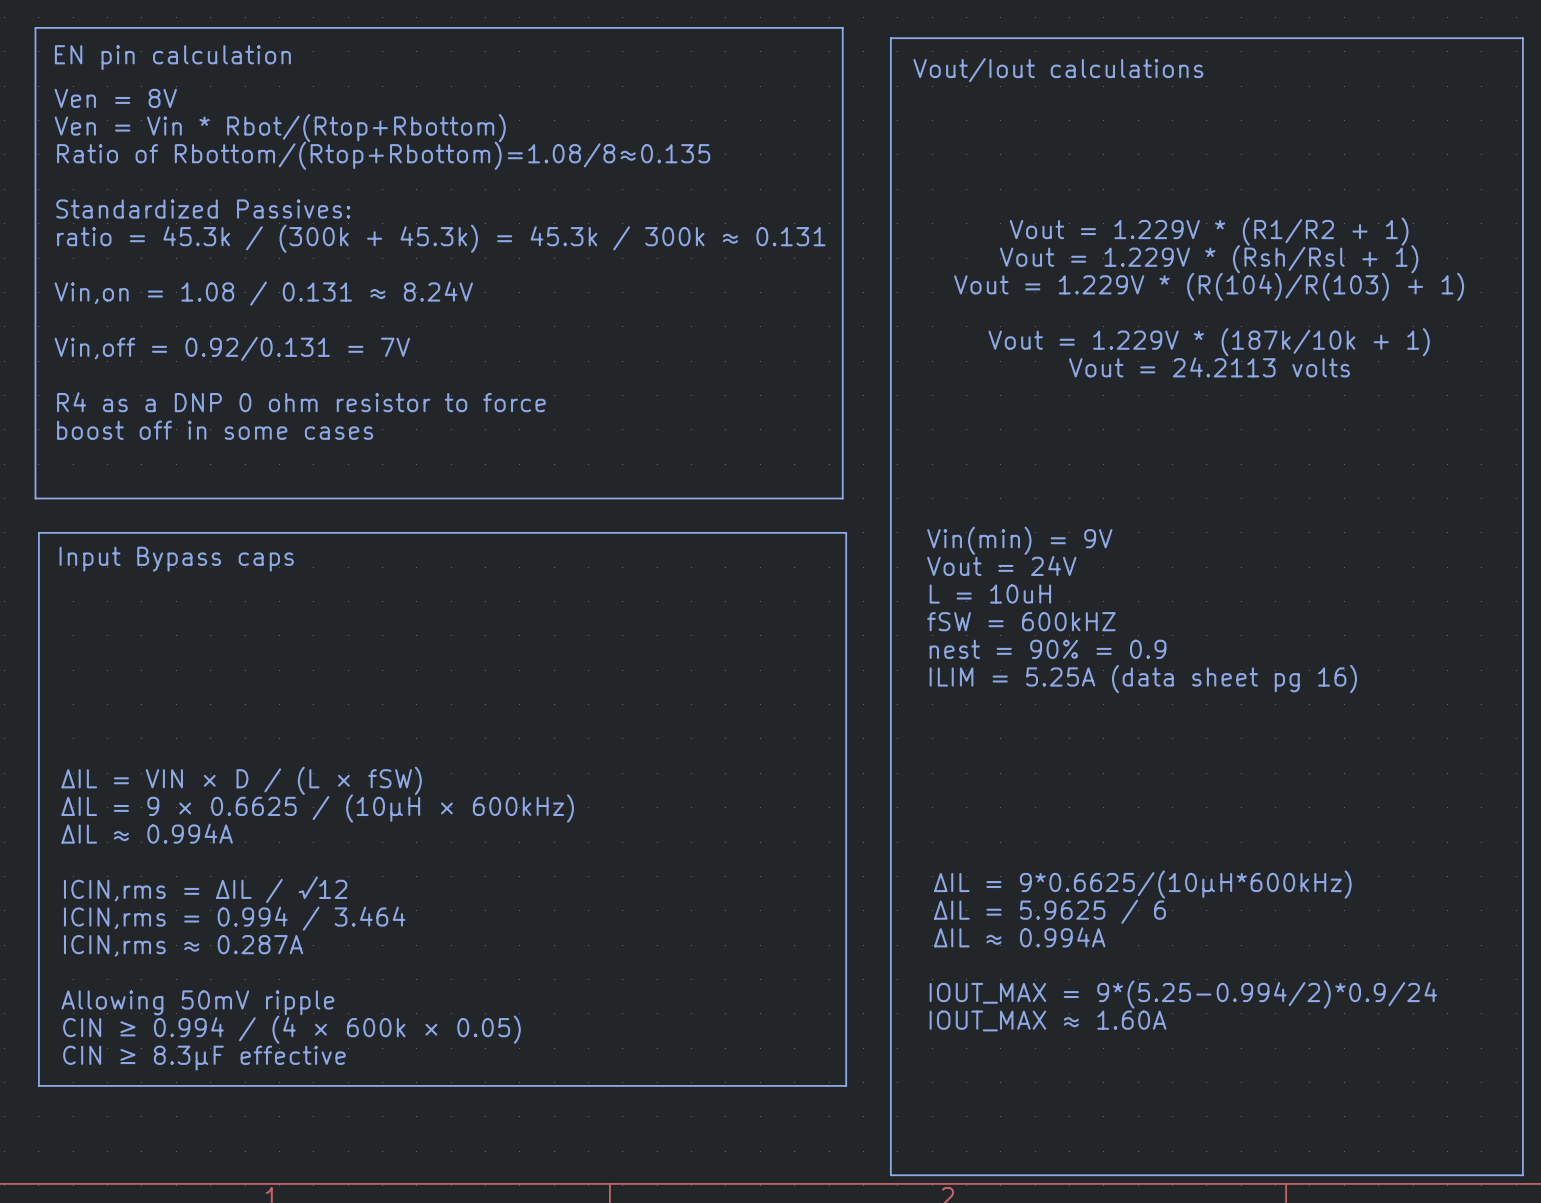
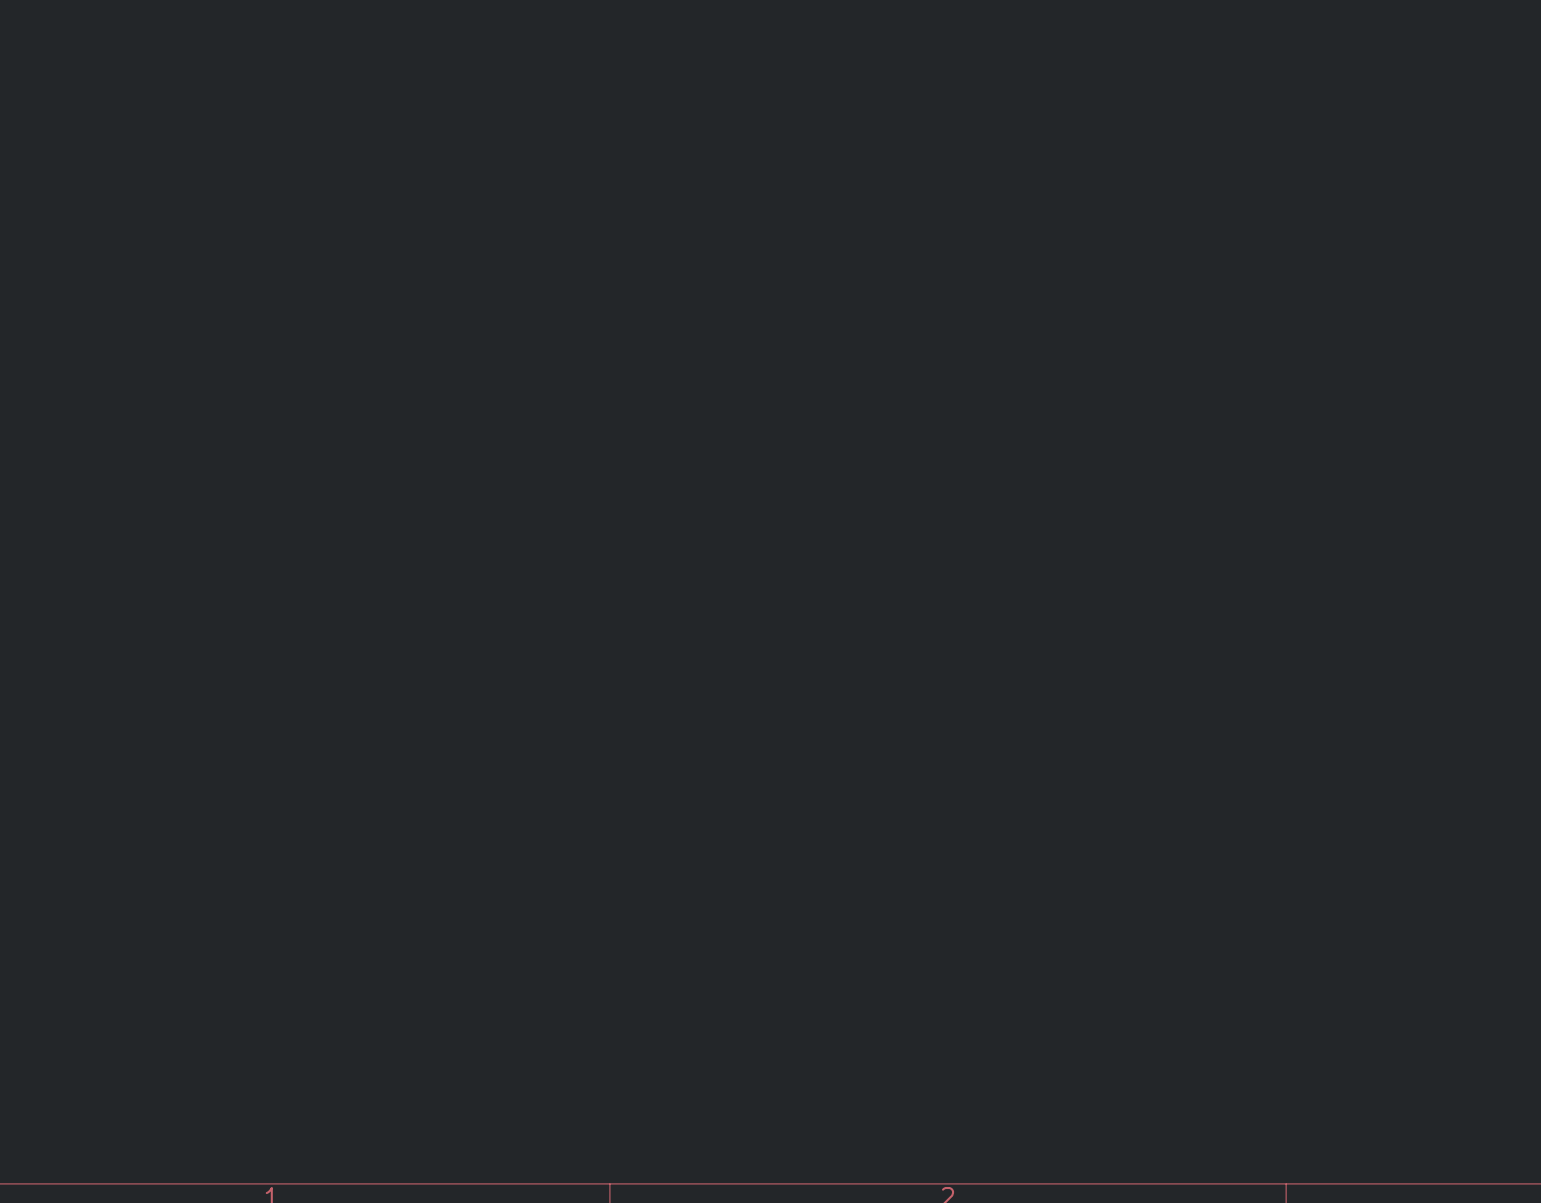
line: (35, 27) (842, 27) (842, 498) (35, 498) (35, 27) -> none
line: (890, 38) (1522, 38) (1522, 1175) (890, 1175) (890, 38) -> none
text: EN pin calculation (172, 57) -> none
text: Vout/Iout calculations (1058, 70) -> none
text: Ven = 8V (115, 98) -> none
text: Ven = Vin * Rbot/(Rtop+Rbottom) (280, 128) -> none
text: Ratio of Rbottom/(Rtop+Rbottom)=1.08/8≈0.135 (383, 155) -> none
text: Standardized Passives: (203, 209) -> none
text: Vout = 1.229V * (R1/R2 + 1) (1209, 231) -> none
text: ratio = 45.3k / (300k + 45.3k) = 45.3k / 300k ≈ 0.131 (441, 238) -> none
text: Vout = 1.229V * (Rsh/Rsl + 1) (1209, 259) -> none
text: Vout = 1.229V * (R(104)/R(103) + 1) (1209, 286) -> none
text: Vin,on = 1.08 / 0.131 ≈ 8.24V (263, 293) -> none
text: Vout = 1.229V * (187k/10k + 1) (1209, 342) -> none
text: Vin,off = 0.92/0.131 = 7V (232, 348) -> none
text: Vout = 24.2113 volts (1209, 367) -> none
text: R4 as a DNP 0 ohm resistor to force (301, 402) -> none
text: boost off in some cases (215, 430) -> none
line: (38, 532) (846, 532) (846, 1085) (38, 1085) (38, 532) -> none
text: Vin(min) = 9V (1019, 540) -> none
text: Input Bypass caps (176, 559) -> none
text: Vout = 24V (1001, 565) -> none
text: L = 10uH (990, 594) -> none
text: fSW = 600kHZ (1021, 621) -> none
text: nest = 90% = 0.9 (1048, 649) -> none
text: ILIM = 5.25A (data sheet pg 16) (1143, 679) -> none
text: ΔIL = VIN × D / (L × fSW) (241, 780) -> none
text: ΔIL = 9 × 0.6625 / (10µH × 600kHz) (317, 808) -> none
text: ΔIL ≈ 0.994A (147, 833) -> none
text: ΔIL = 9*0.6625/(10µH*600kHz) (1142, 884) -> none
text: ICIN,rms = ΔIL / √12 (205, 889) -> none
text: ΔIL = 5.9625 / 6 (1049, 911) -> none
text: ICIN,rms = 0.994 / 3.464 (234, 918) -> none
text: ΔIL ≈ 0.994A (1019, 937) -> none
text: ICIN,rms ≈ 0.287A (183, 945) -> none
text: IOUT_MAX = 9*(5.25-0.994/2)*0.9/24 (1183, 994) -> none
text: Allowing 50mV ripple (197, 1002) -> none
text: IOUT_MAX ≈ 1.60A (1048, 1020) -> none
text: CIN ≥ 0.994 / (4 × 600k × 0.05) (291, 1029) -> none
text: CIN ≥ 8.3µF effective (204, 1058) -> none

